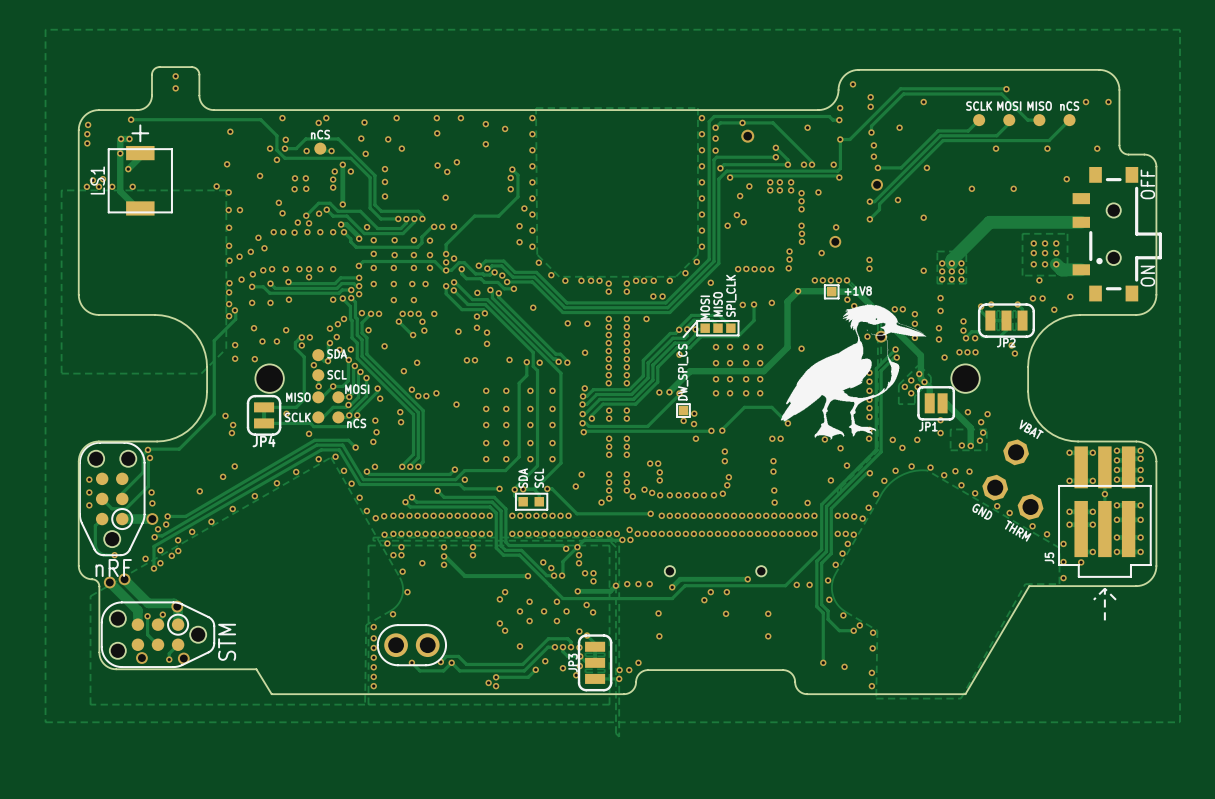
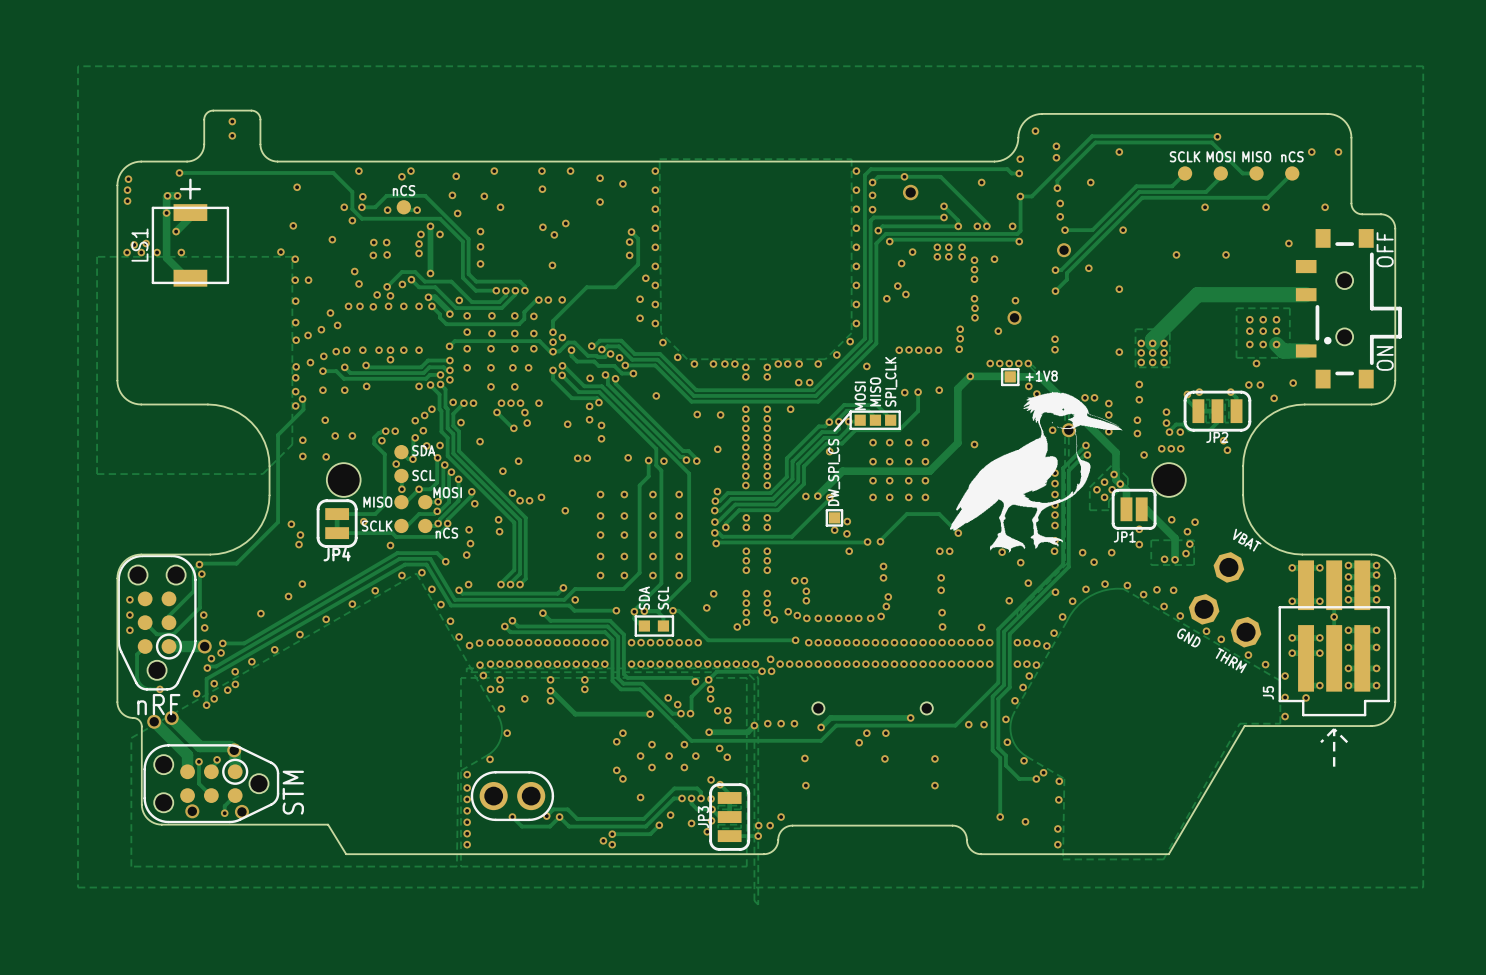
via: (286, 330) -> none
via: (301, 337) -> none
via: none -> (385, 431)
via: (309, 337) -> none
via: none -> (395, 431)

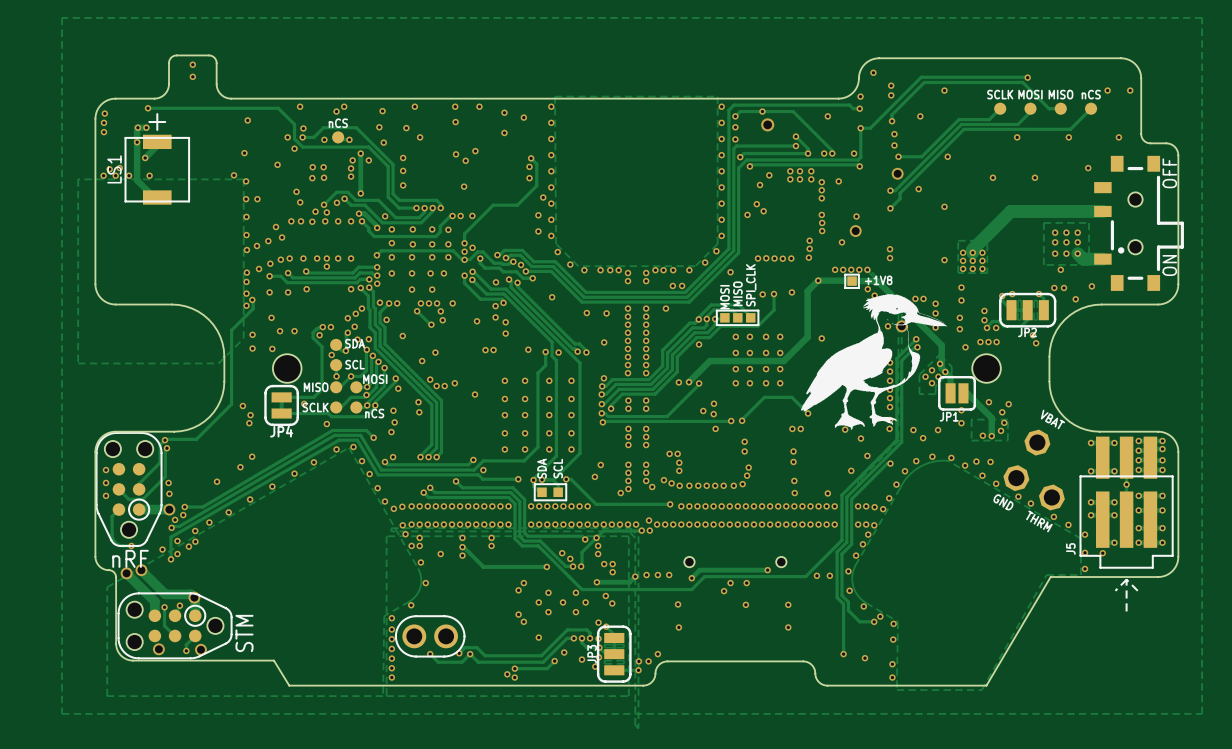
line: (850, 411) (834, 430) -> none
line: (826, 510) (826, 525) (841, 525) -> none
line: (842, 510) (826, 510) -> none
line: (842, 510) (842, 525) -> none
DW_SPI_CS: (834, 517) -> none

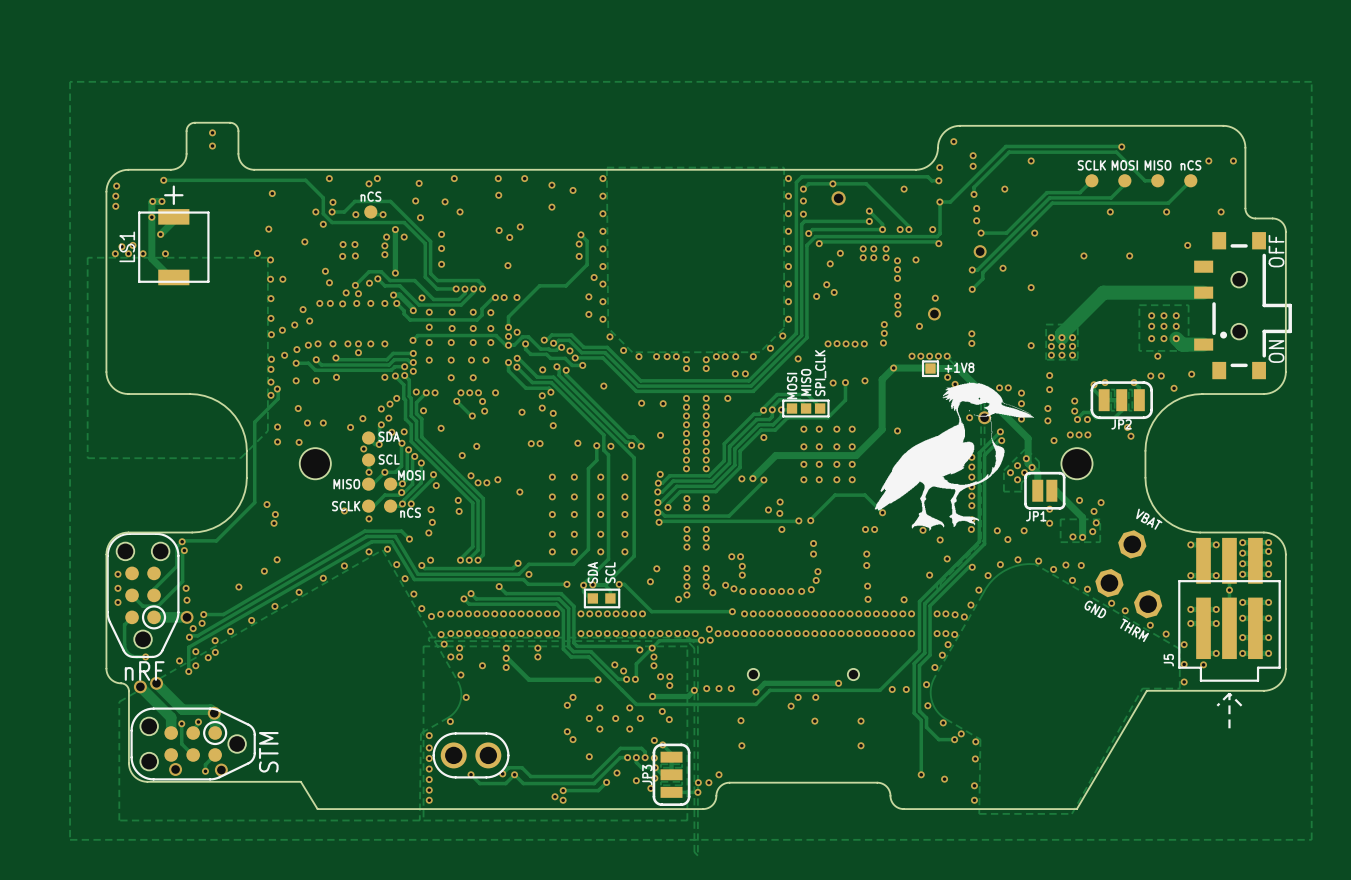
track: (319, 327) (313, 332) (313, 337) (322, 346) (322, 389) (313, 397) (281, 397) -> none
via: (322, 327) -> none
via: (304, 403) -> none
JP4: (281, 405) -> none
track: (375, 405) (365, 416) (331, 416) (328, 413) (281, 413) -> none
via: none -> (344, 510)
via: none -> (369, 518)
via: (326, 424) -> none

